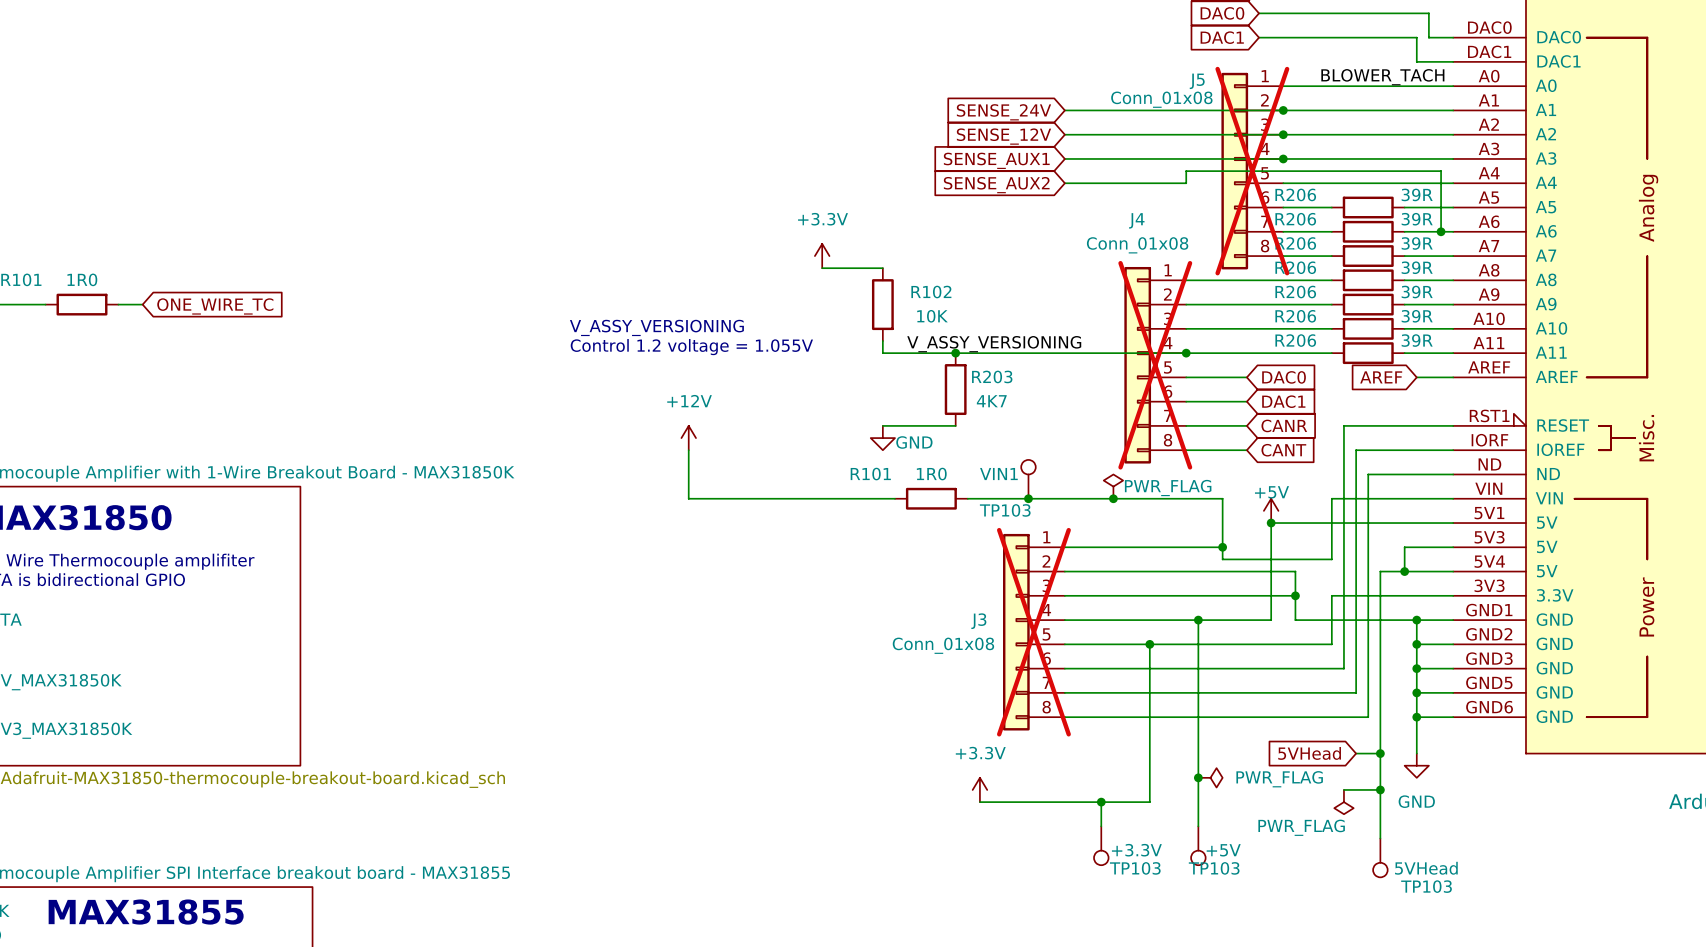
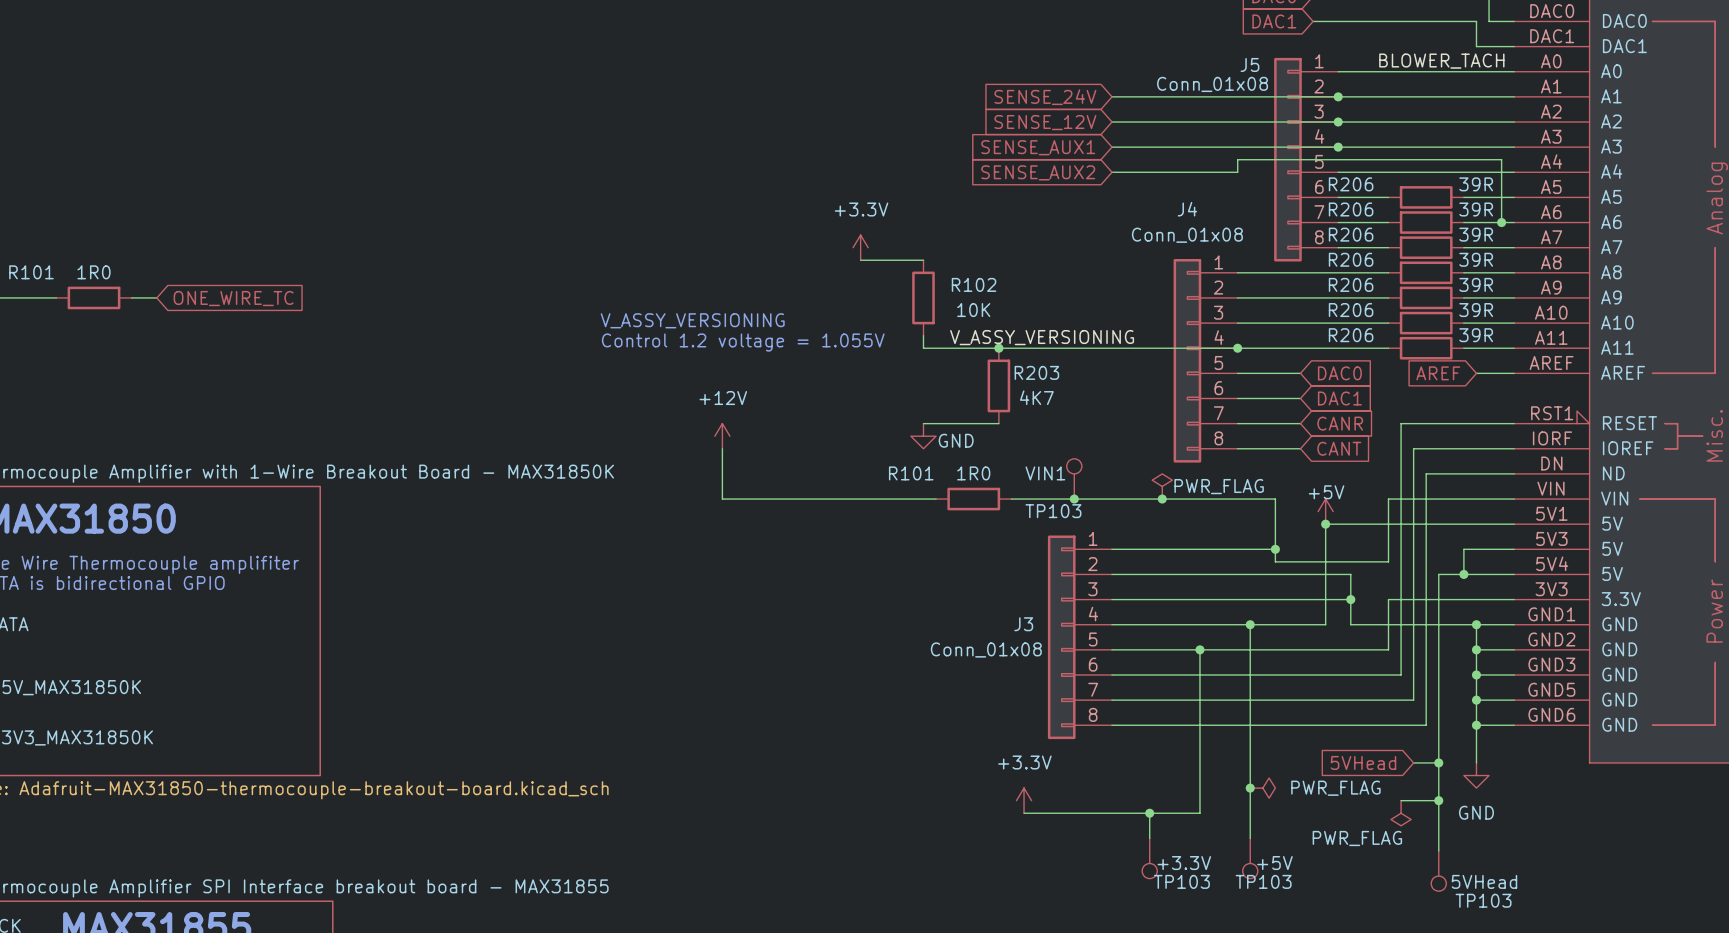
J5 do-not-place cross: (1252, 171) -> none
J4 do-not-place cross: (1155, 365) -> none
part pin number: ND (1489, 464) -> DN (1551, 463)
J3 do-not-place cross: (1033, 632) -> none

